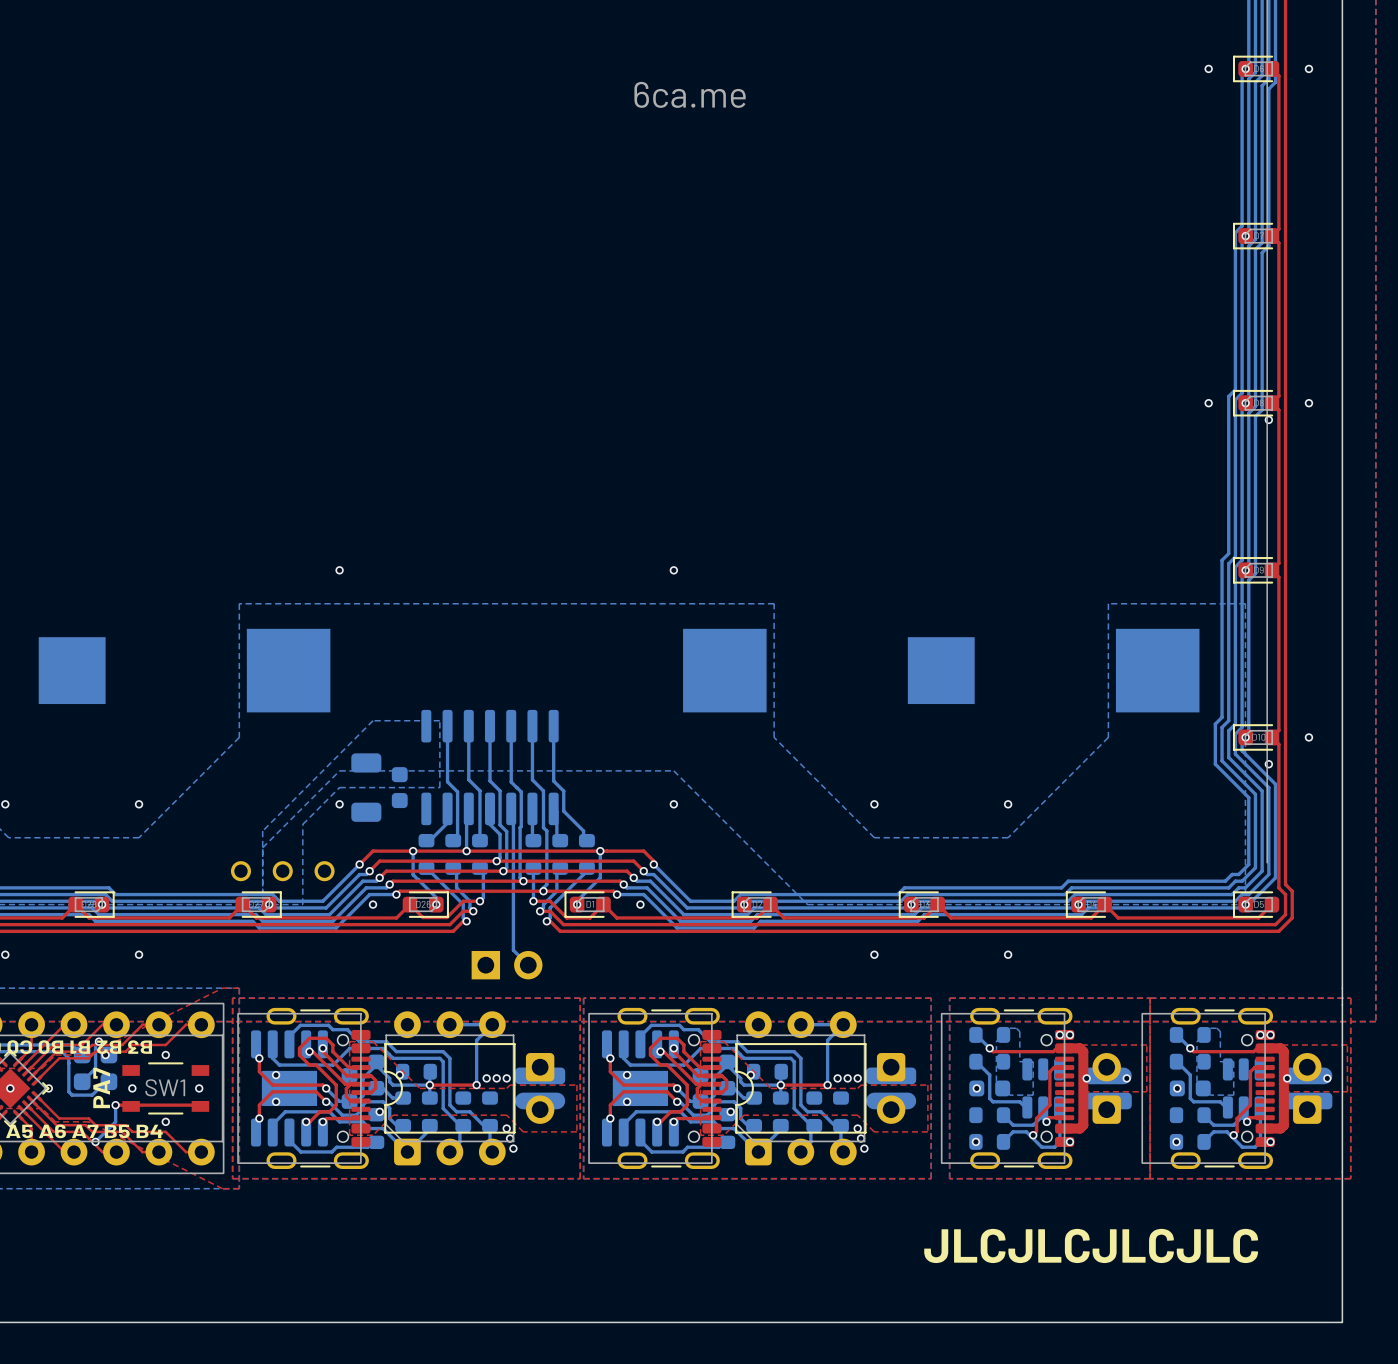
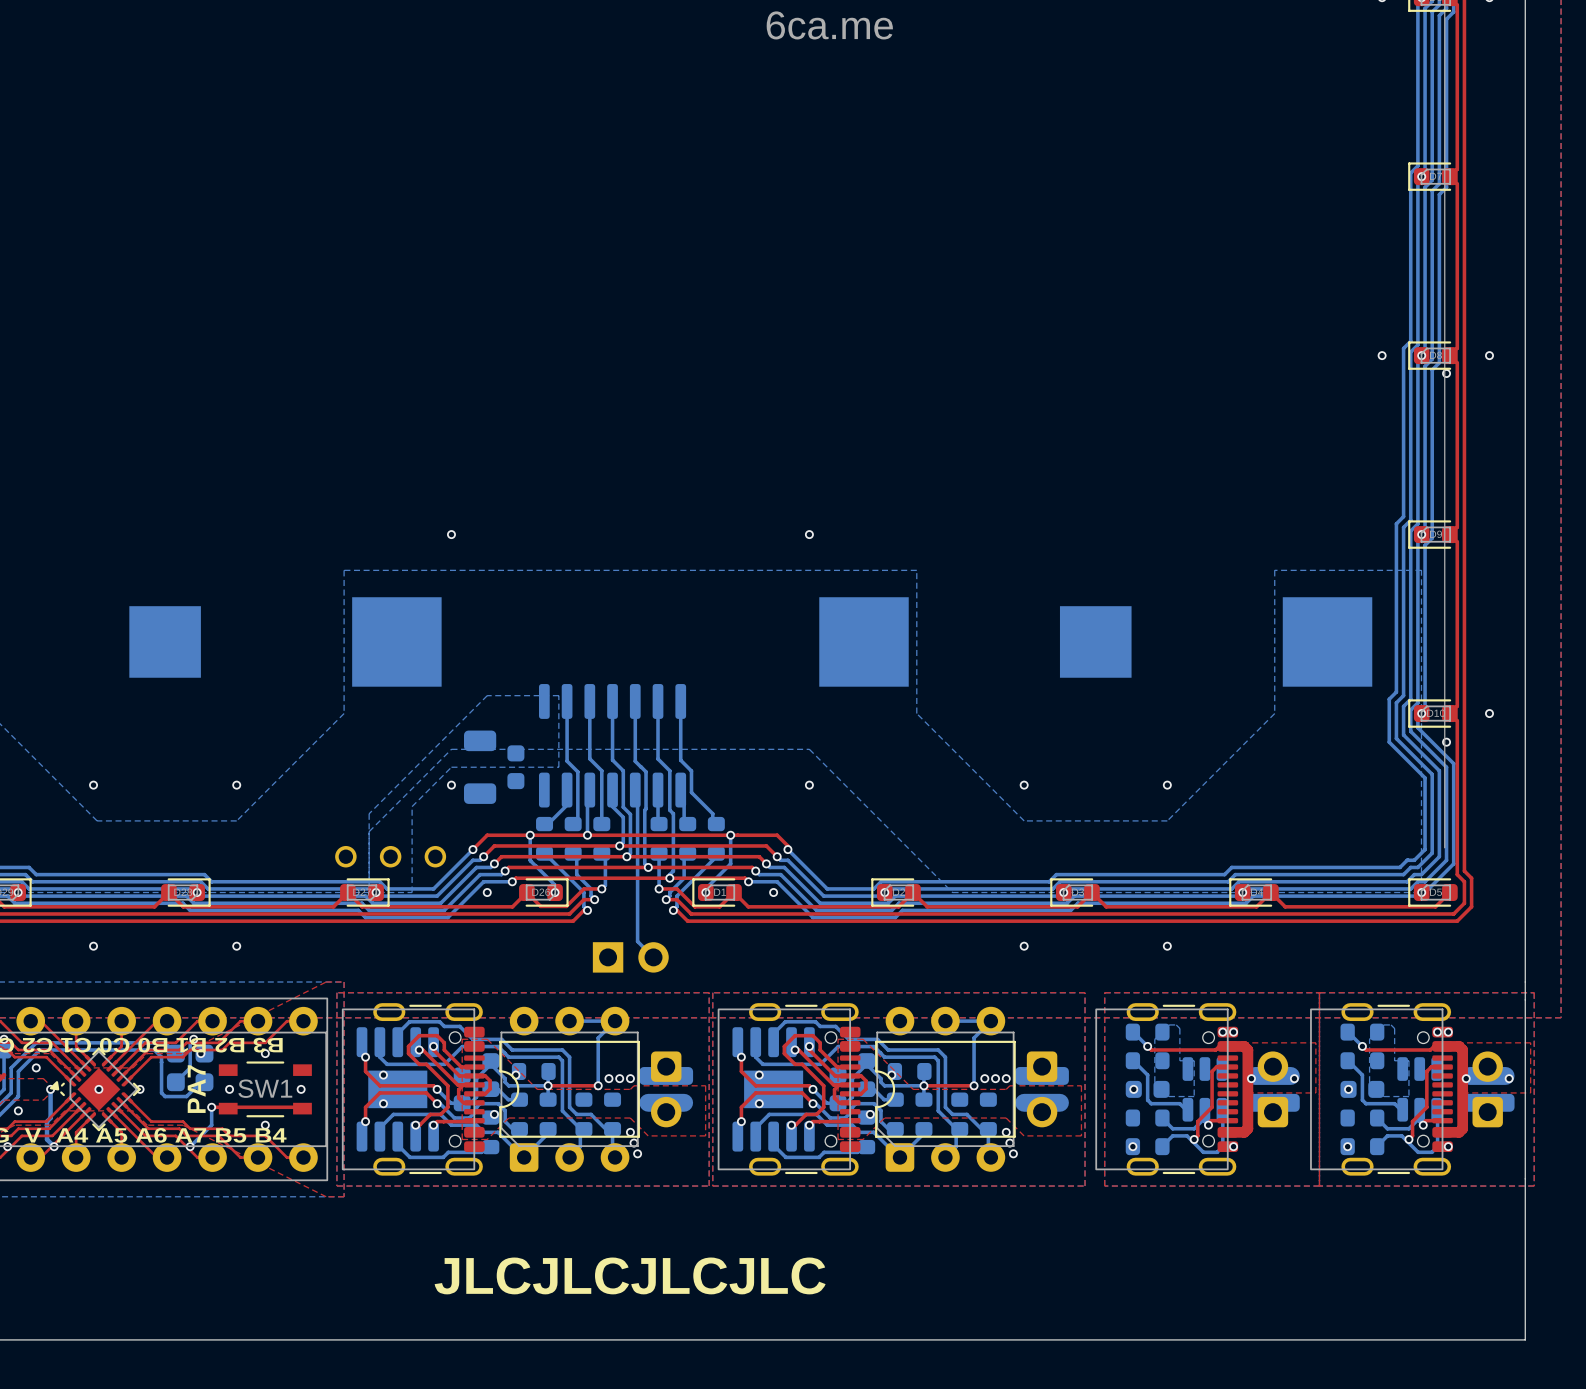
text: JLCJLCJLCJLC (1091, 1245) -> none
text: none -> JLCJLCJLCJLC (630, 1275)

